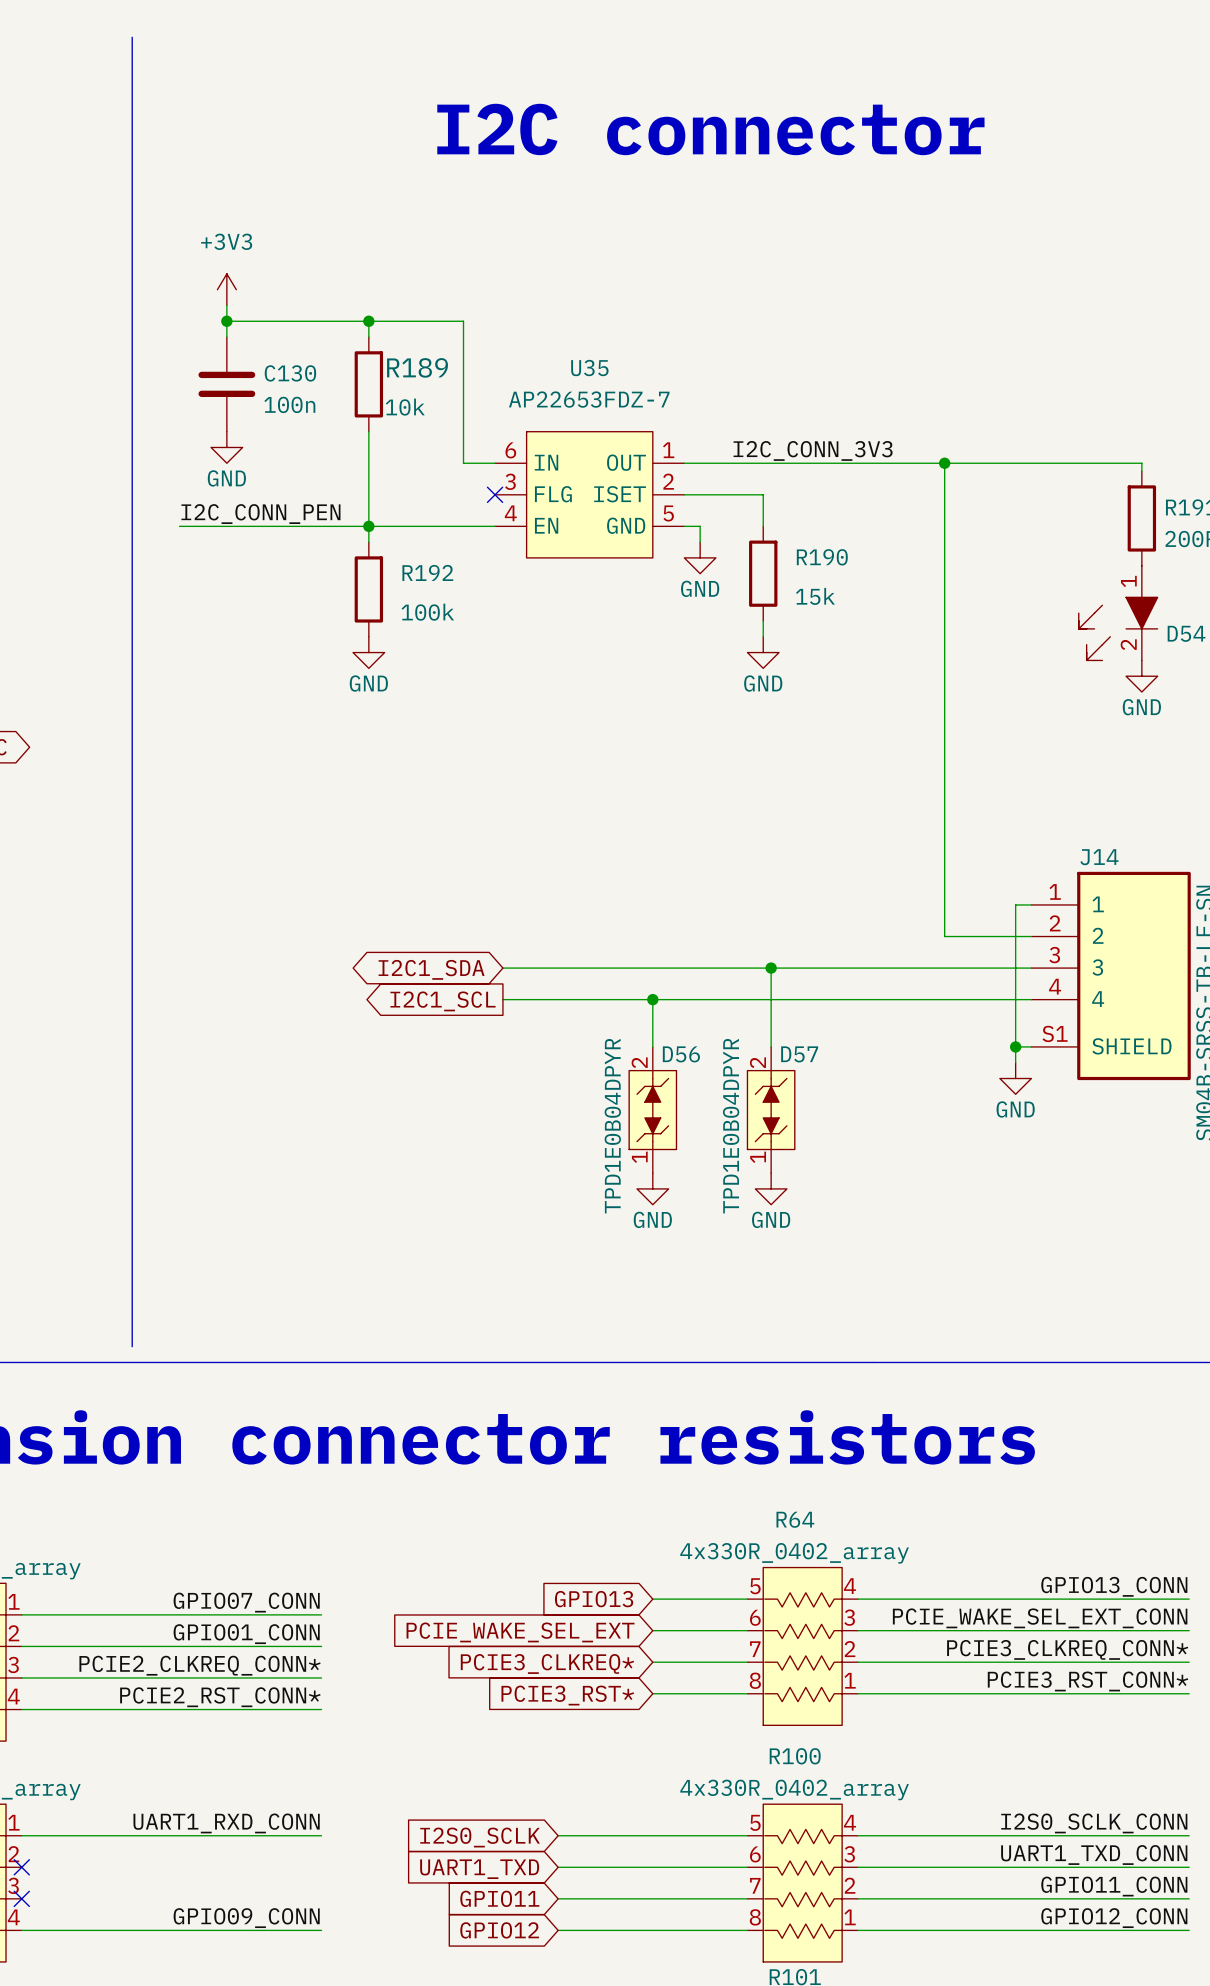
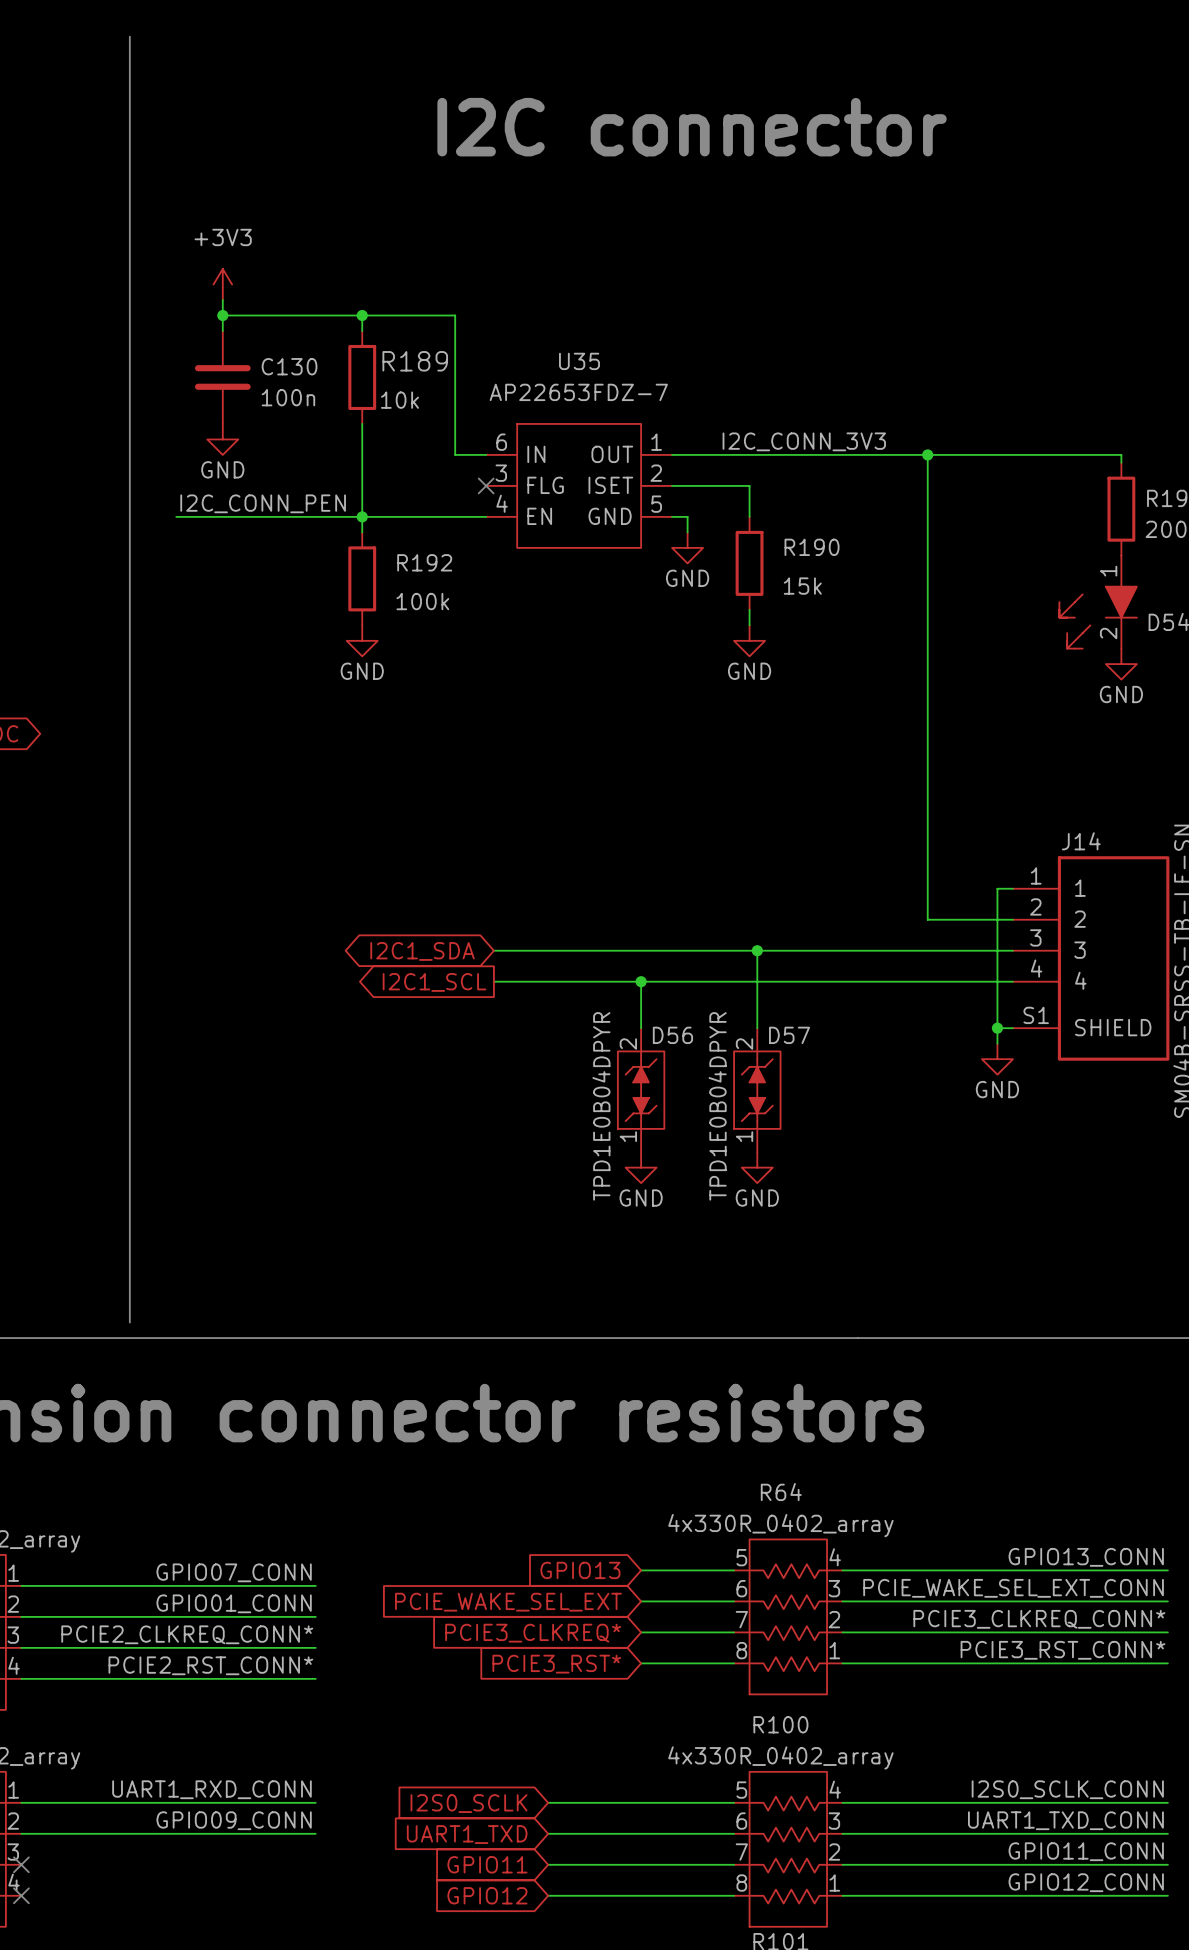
no-connect mark position: (21, 1867) -> (21, 1895)
label position: GPIO09_CONN (246, 1918) -> GPIO09_CONN (234, 1820)
wire: (21, 1930) (321, 1930) -> (21, 1833) (315, 1833)

